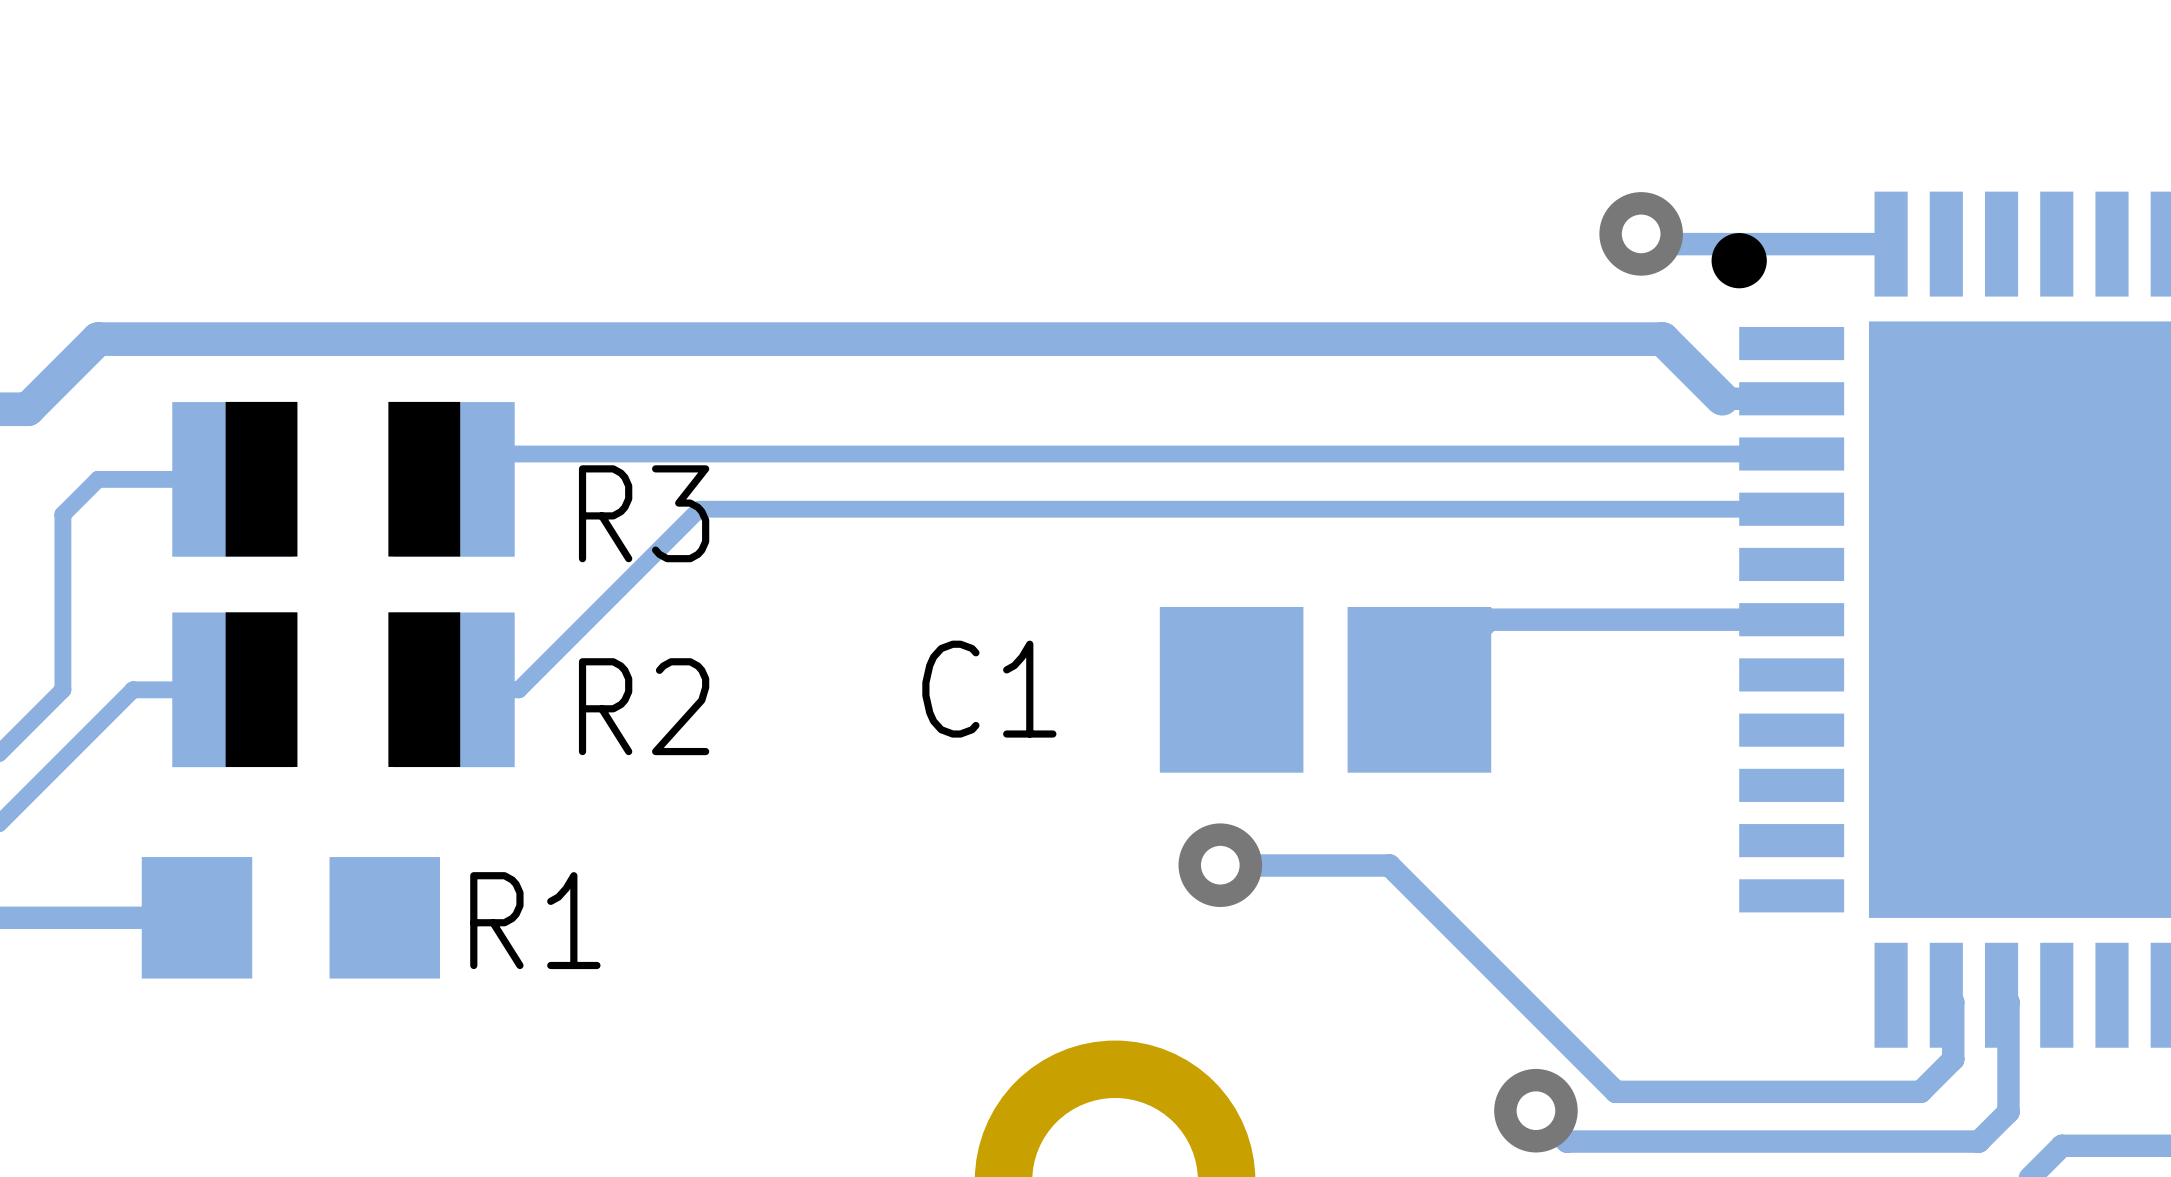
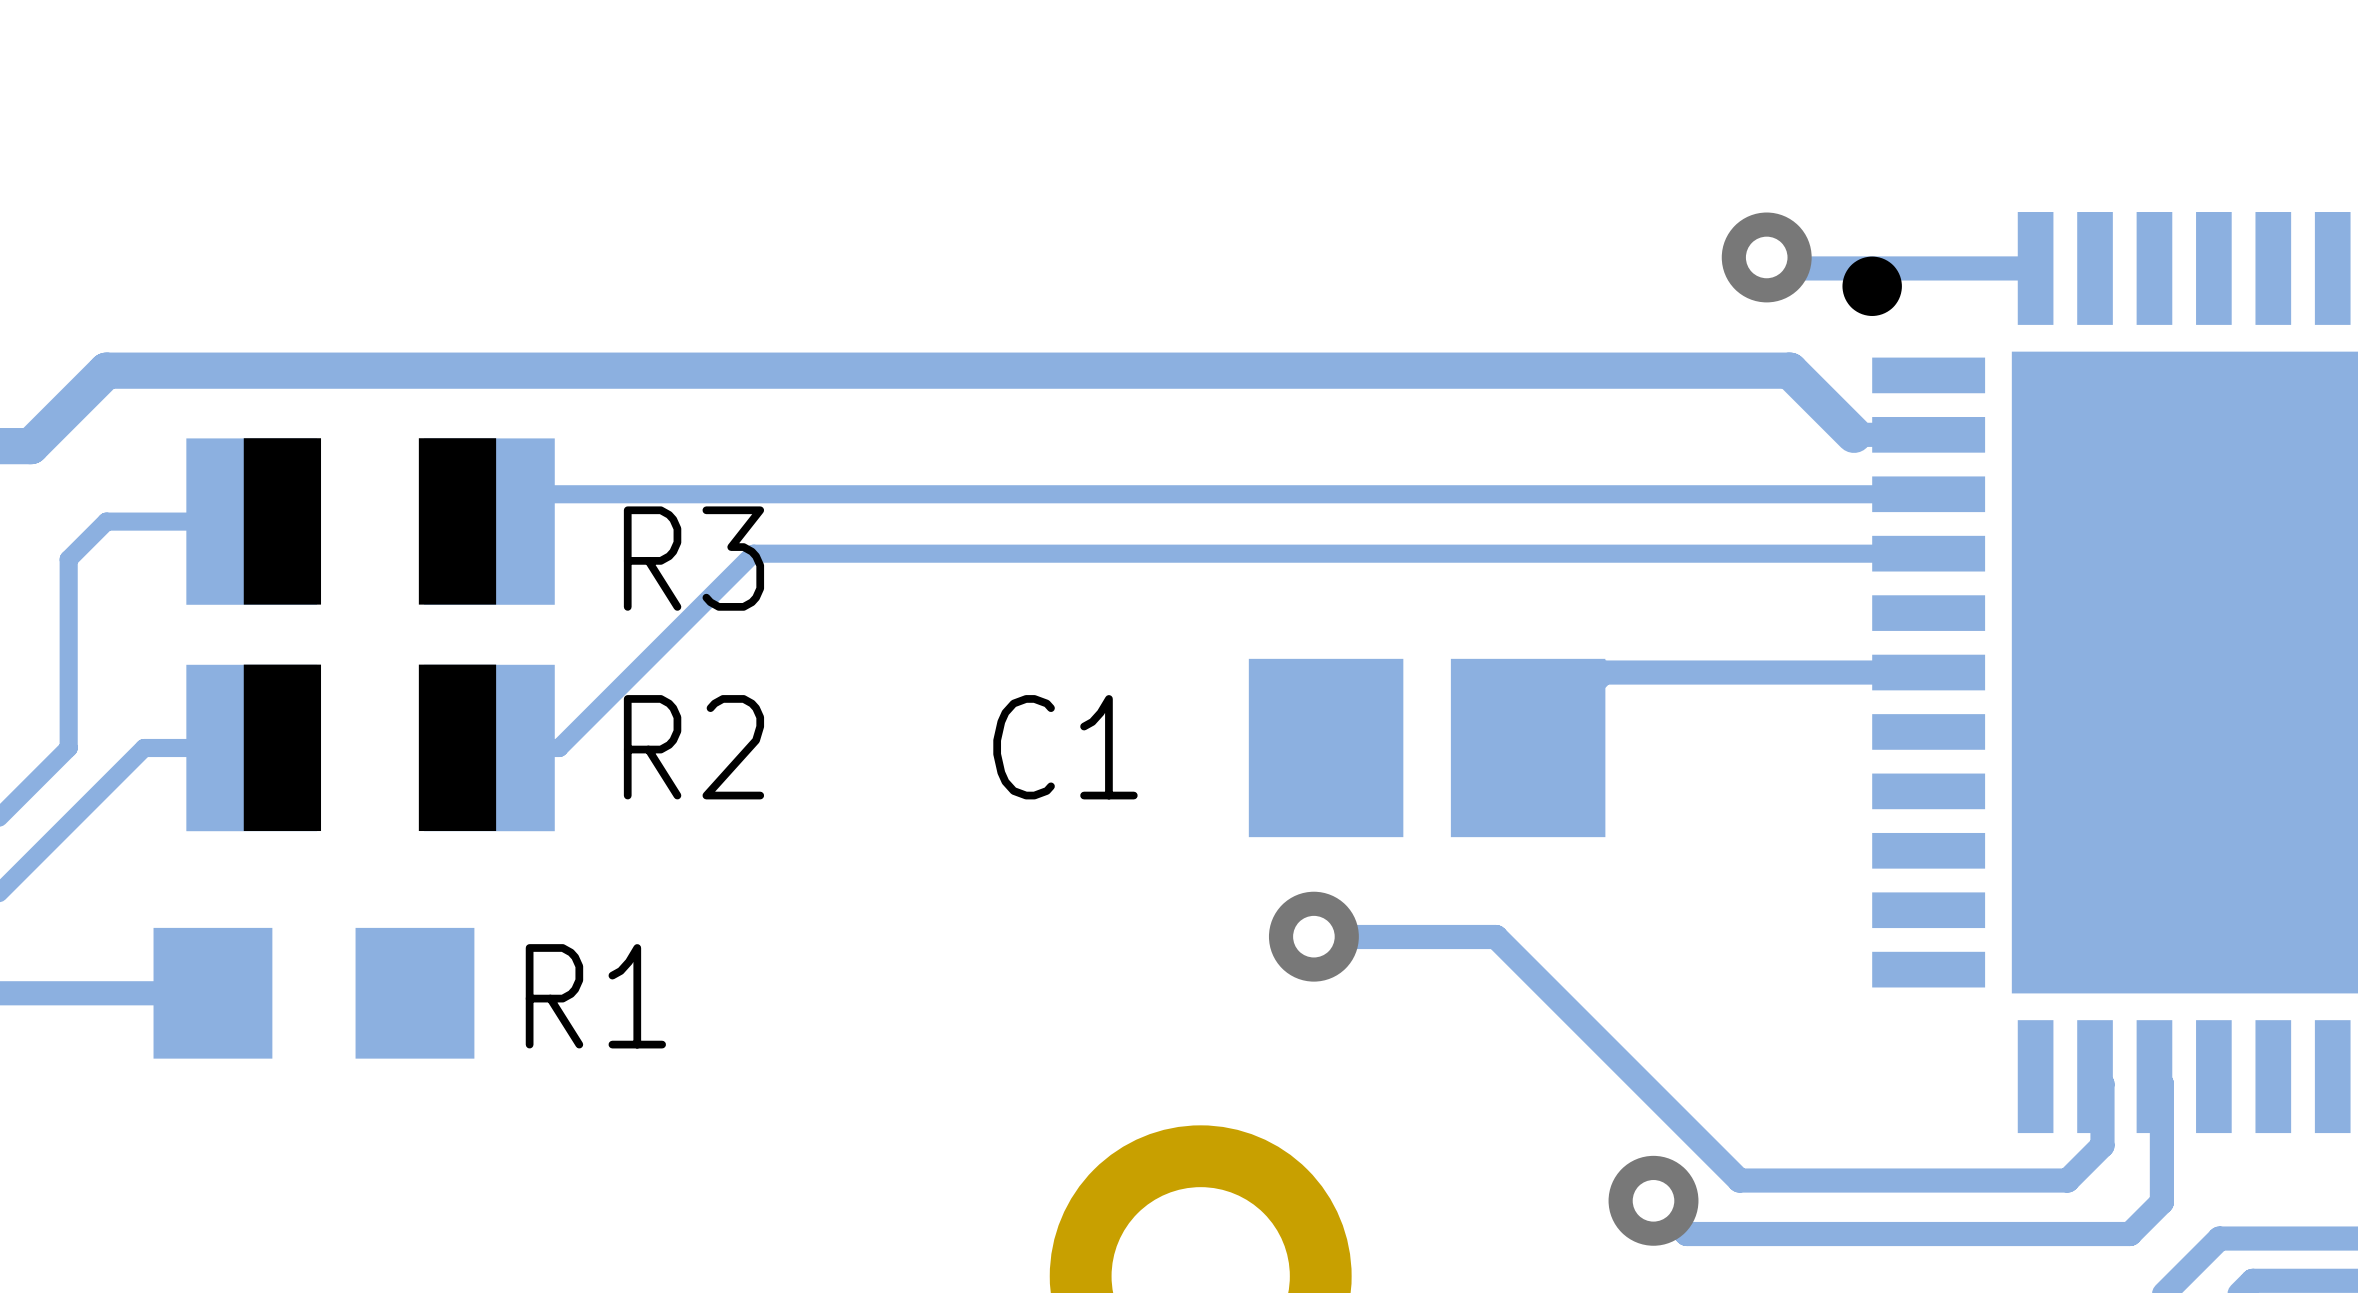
R2 name position: R2 (644, 706) -> R2 (693, 747)
R1 name position: R1 (535, 920) -> R1 (595, 996)

